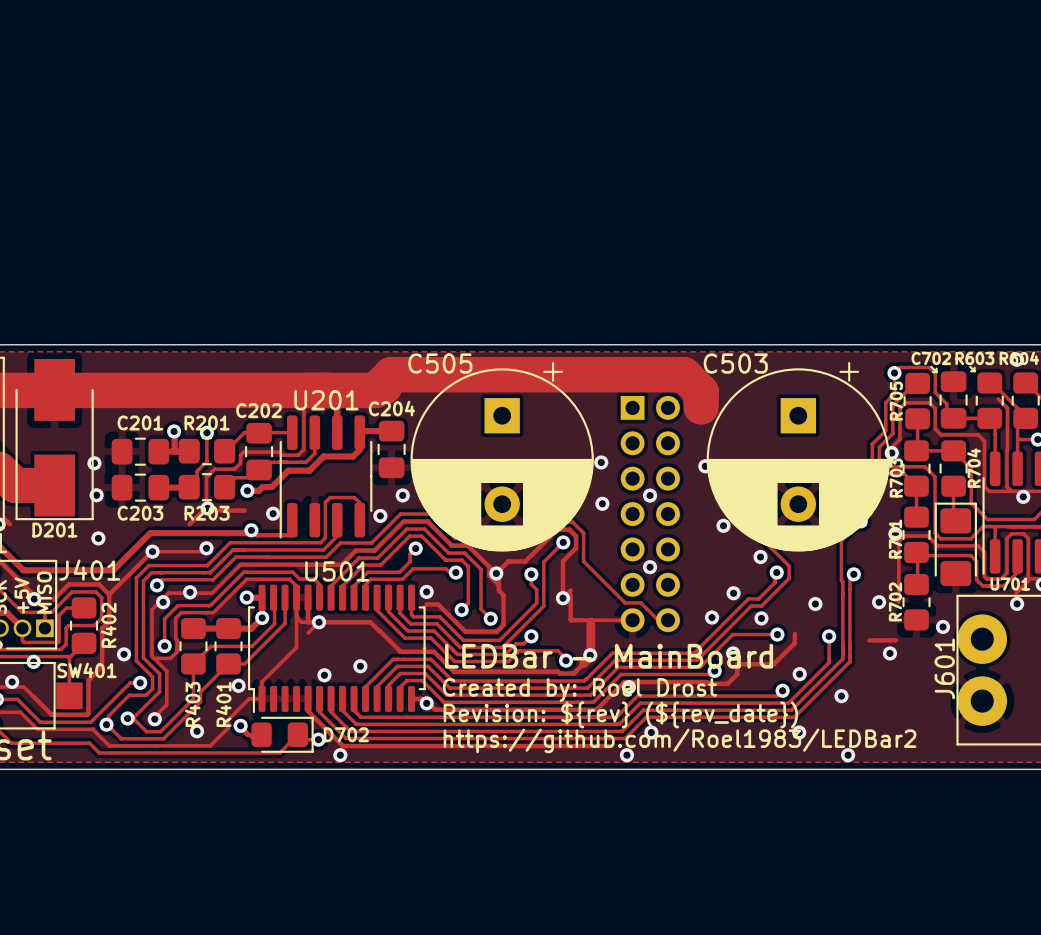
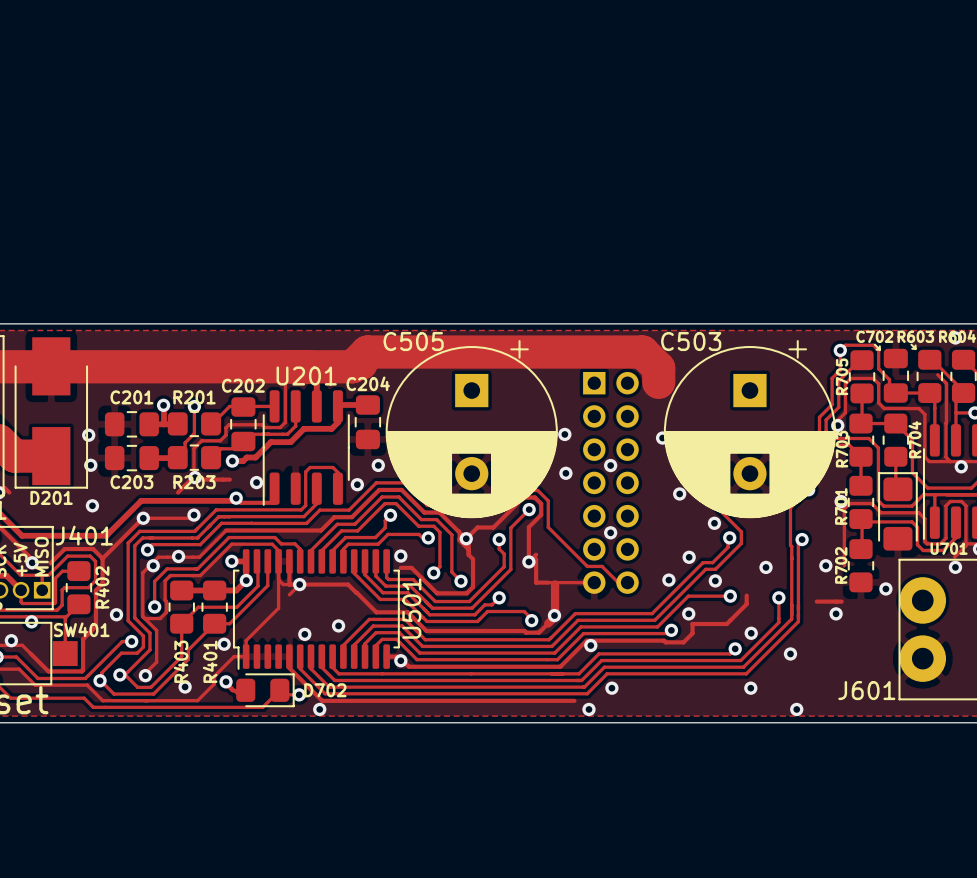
U501 name rotation: 0° (337, 571) -> 90° counterclockwise (411, 608)
U501 name position: U501 (337, 571) -> U501 (411, 608)
text: LEDBar - MainBoard (609, 656) -> none
J601 name rotation: 0° (944, 668) -> 90° clockwise (866, 690)
text: Created by: Roel Drost (579, 690) -> none
text: Revision: ${rev} (${rev_date}) (620, 714) -> none
text: https://github.com/Roel1983/LEDBar2 (680, 740) -> none

